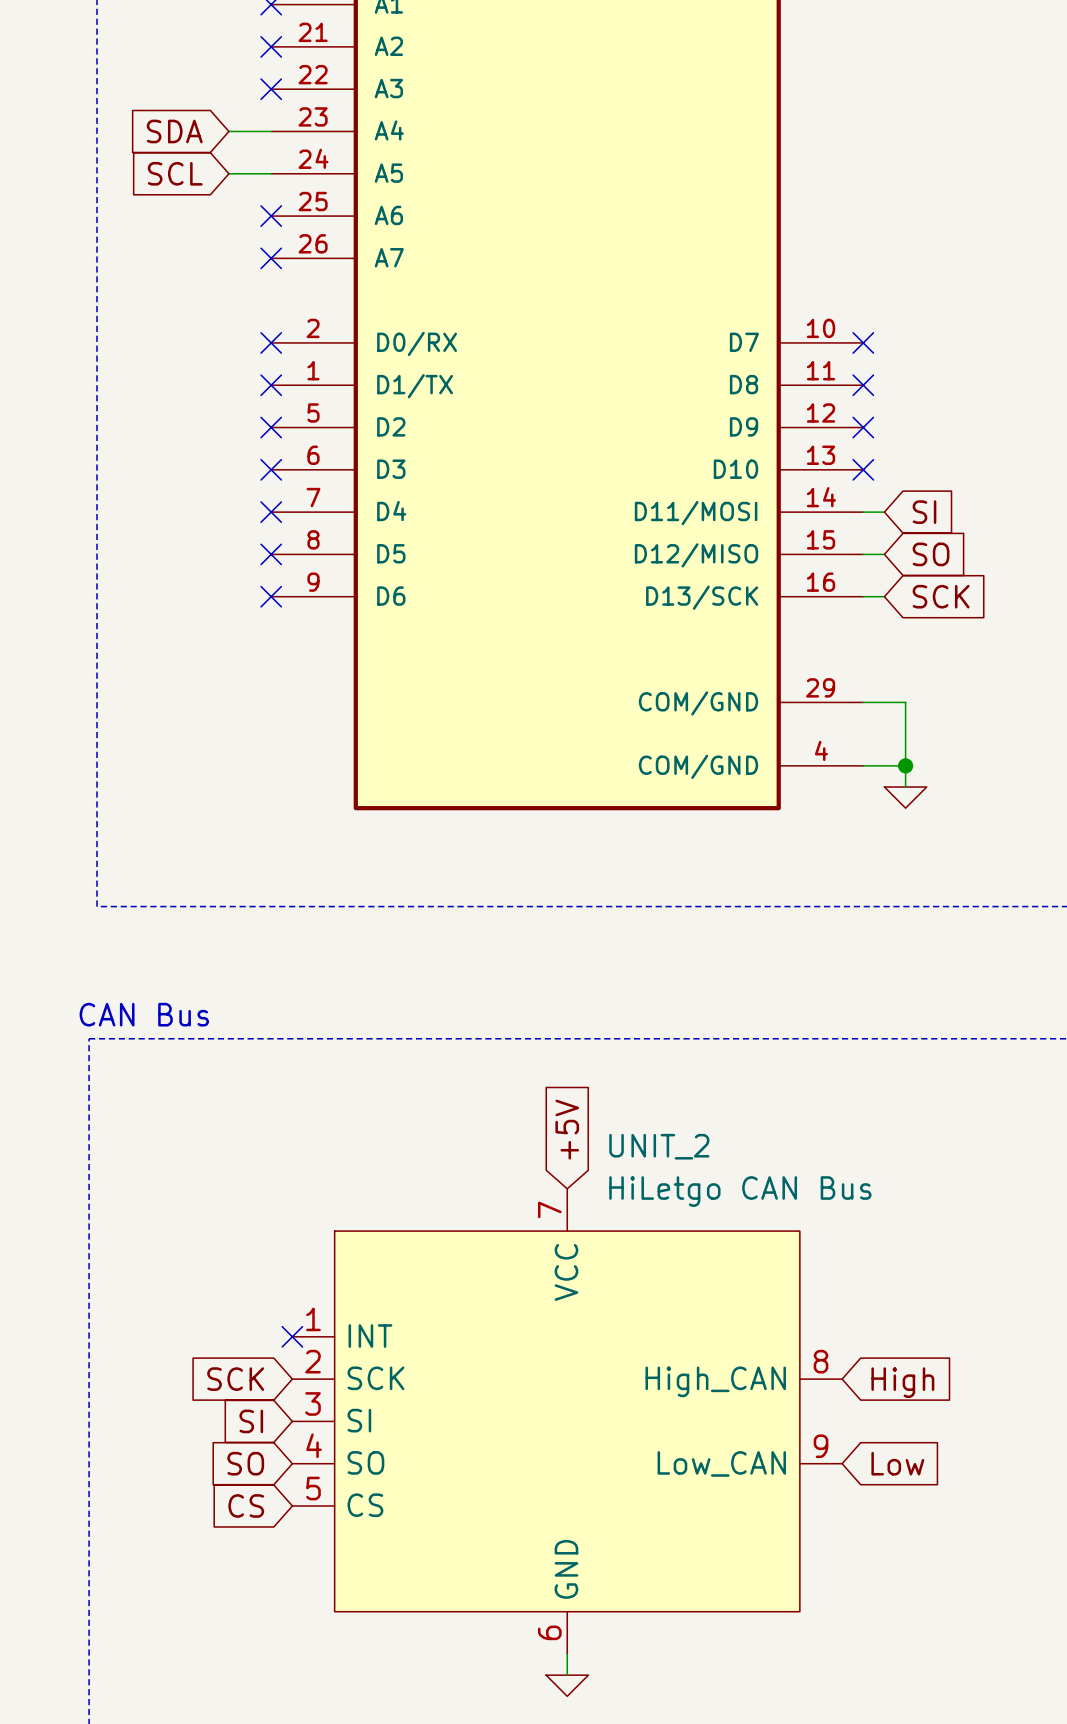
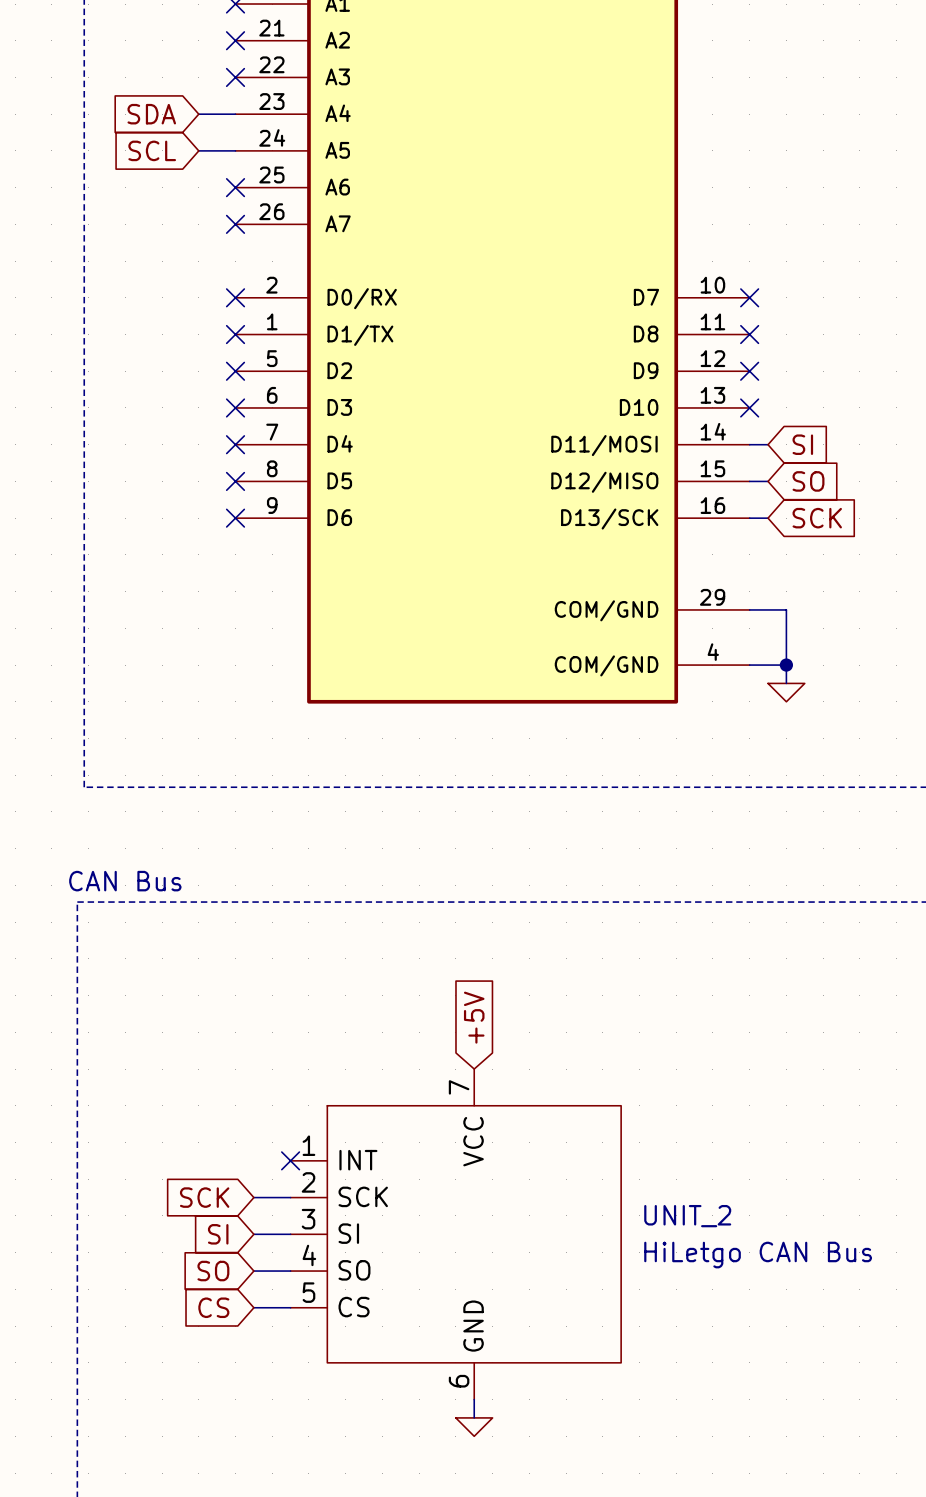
global label position: +5V (567, 1129) -> +5V (474, 1017)
UNIT_2 name position: UNIT_2 (659, 1146) -> UNIT_2 (687, 1216)
UNIT_2 symbol: [292, 1188, 843, 1655] -> [290, 1069, 622, 1400]
UNIT_2 value position: HiLetgo CAN Bus (740, 1191) -> HiLetgo CAN Bus (758, 1255)
no-connect mark position: (292, 1336) -> (290, 1160)
global label: High (902, 1382) -> none
global label: Low (897, 1463) -> none
wire: (567, 1654) (567, 1675) -> (474, 1399) (474, 1417)
power symbol position: (567, 1685) -> (474, 1427)

